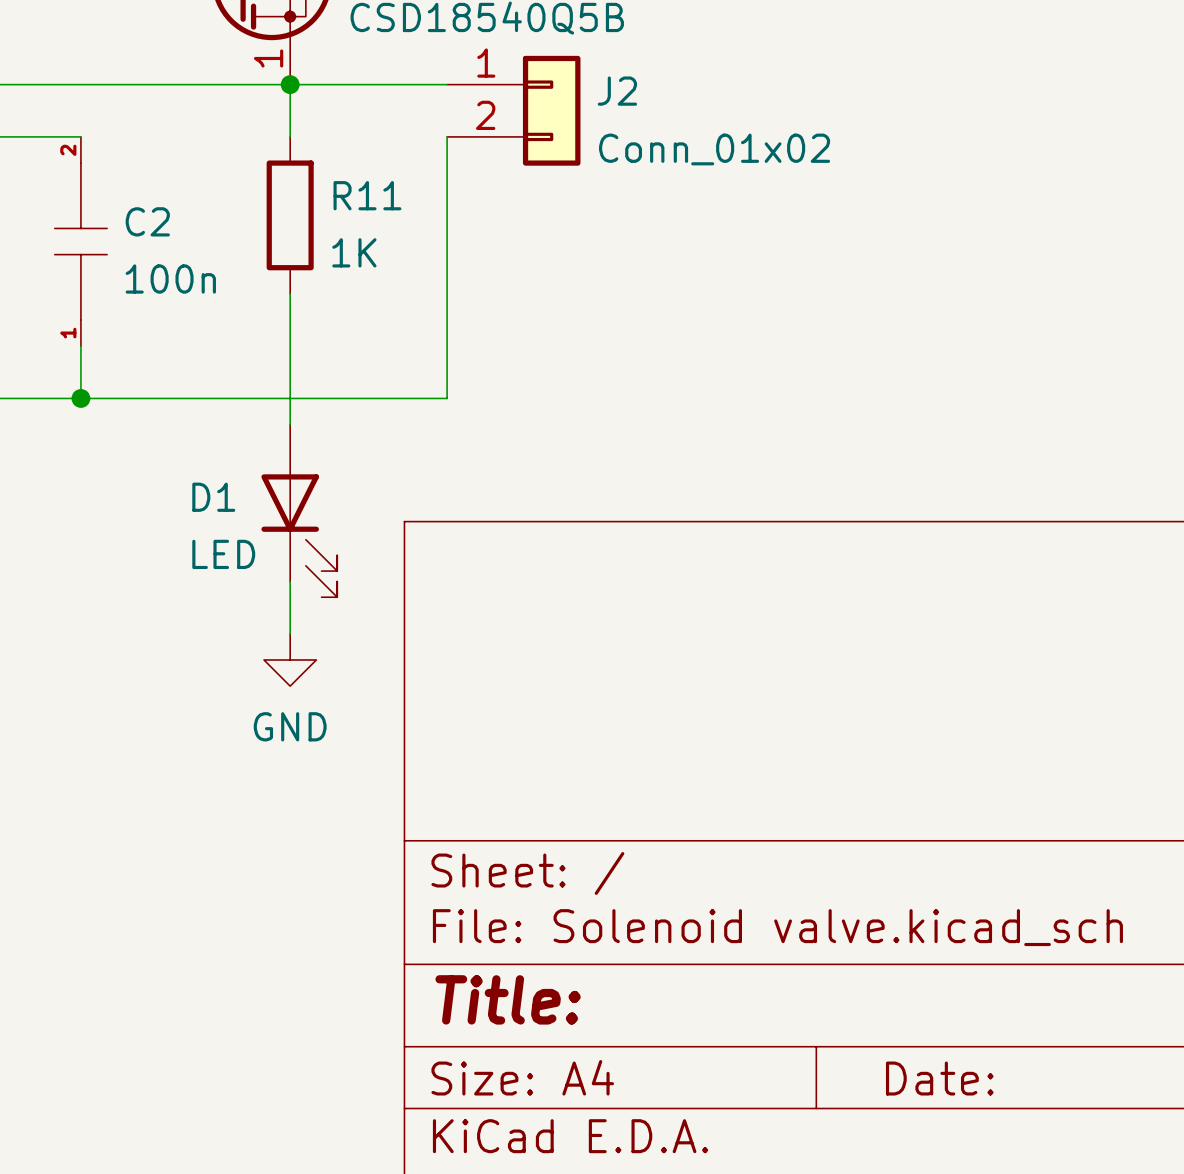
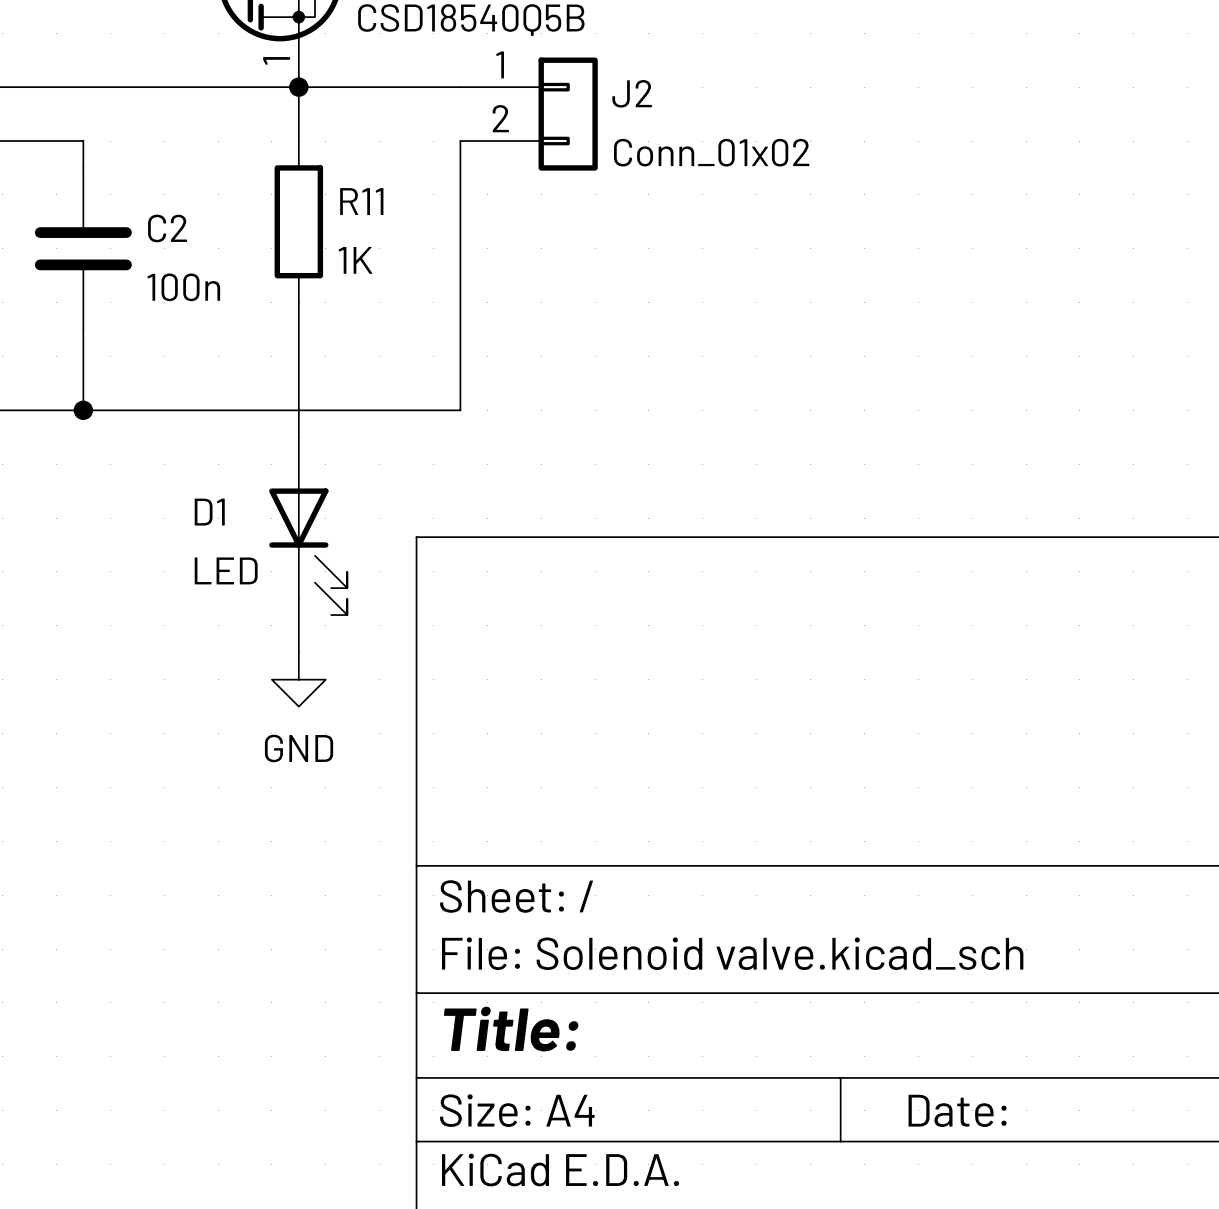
C2 symbol: [54, 136, 108, 347] -> [34, 167, 132, 330]

